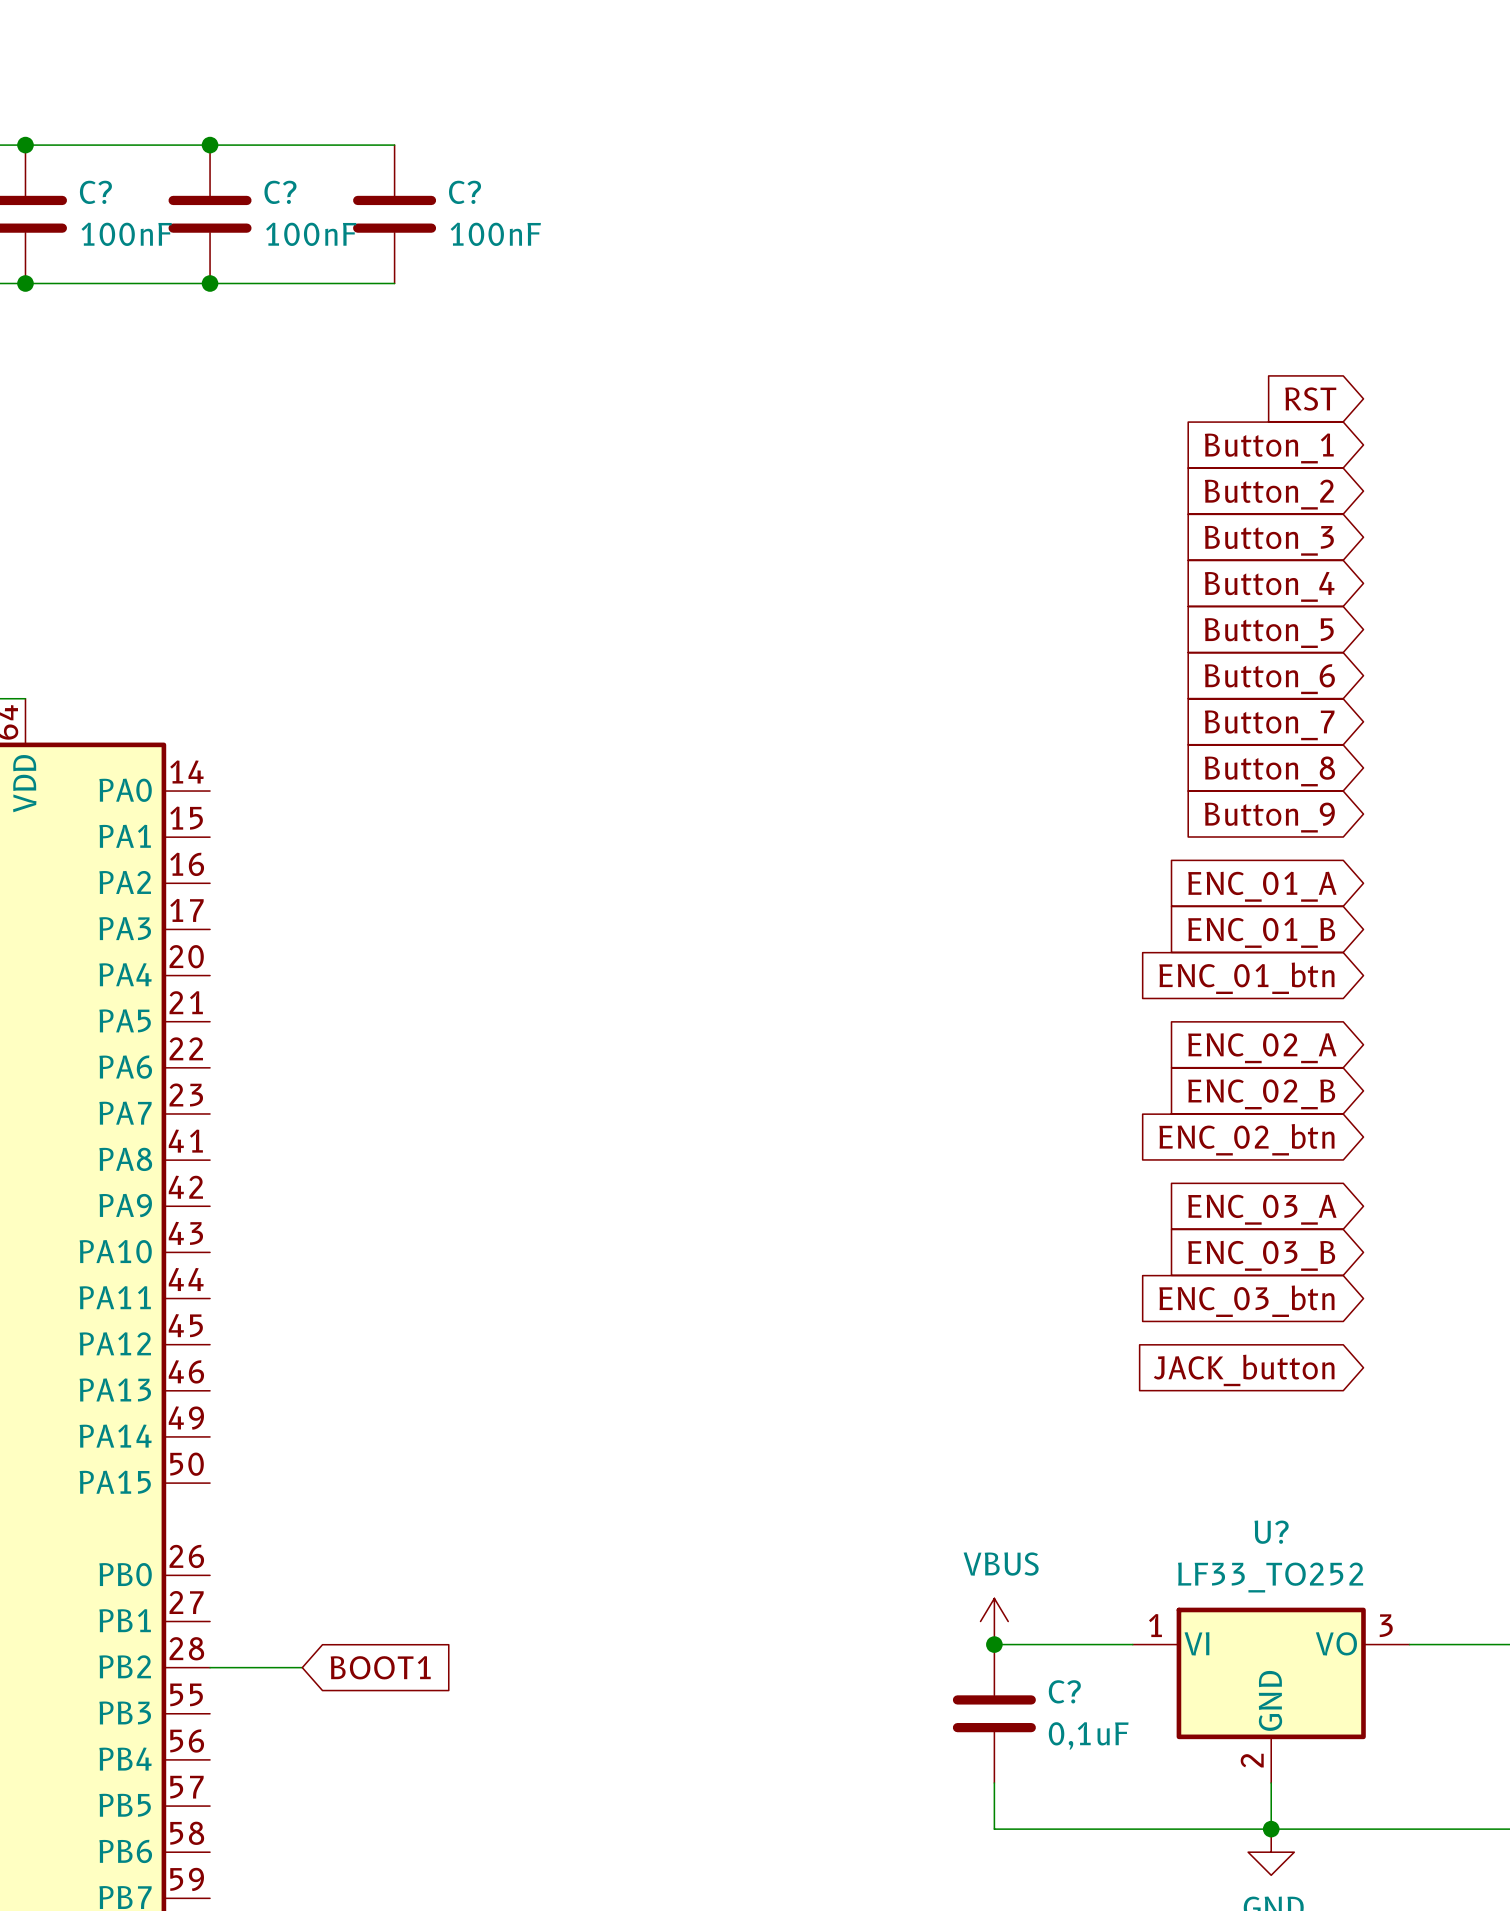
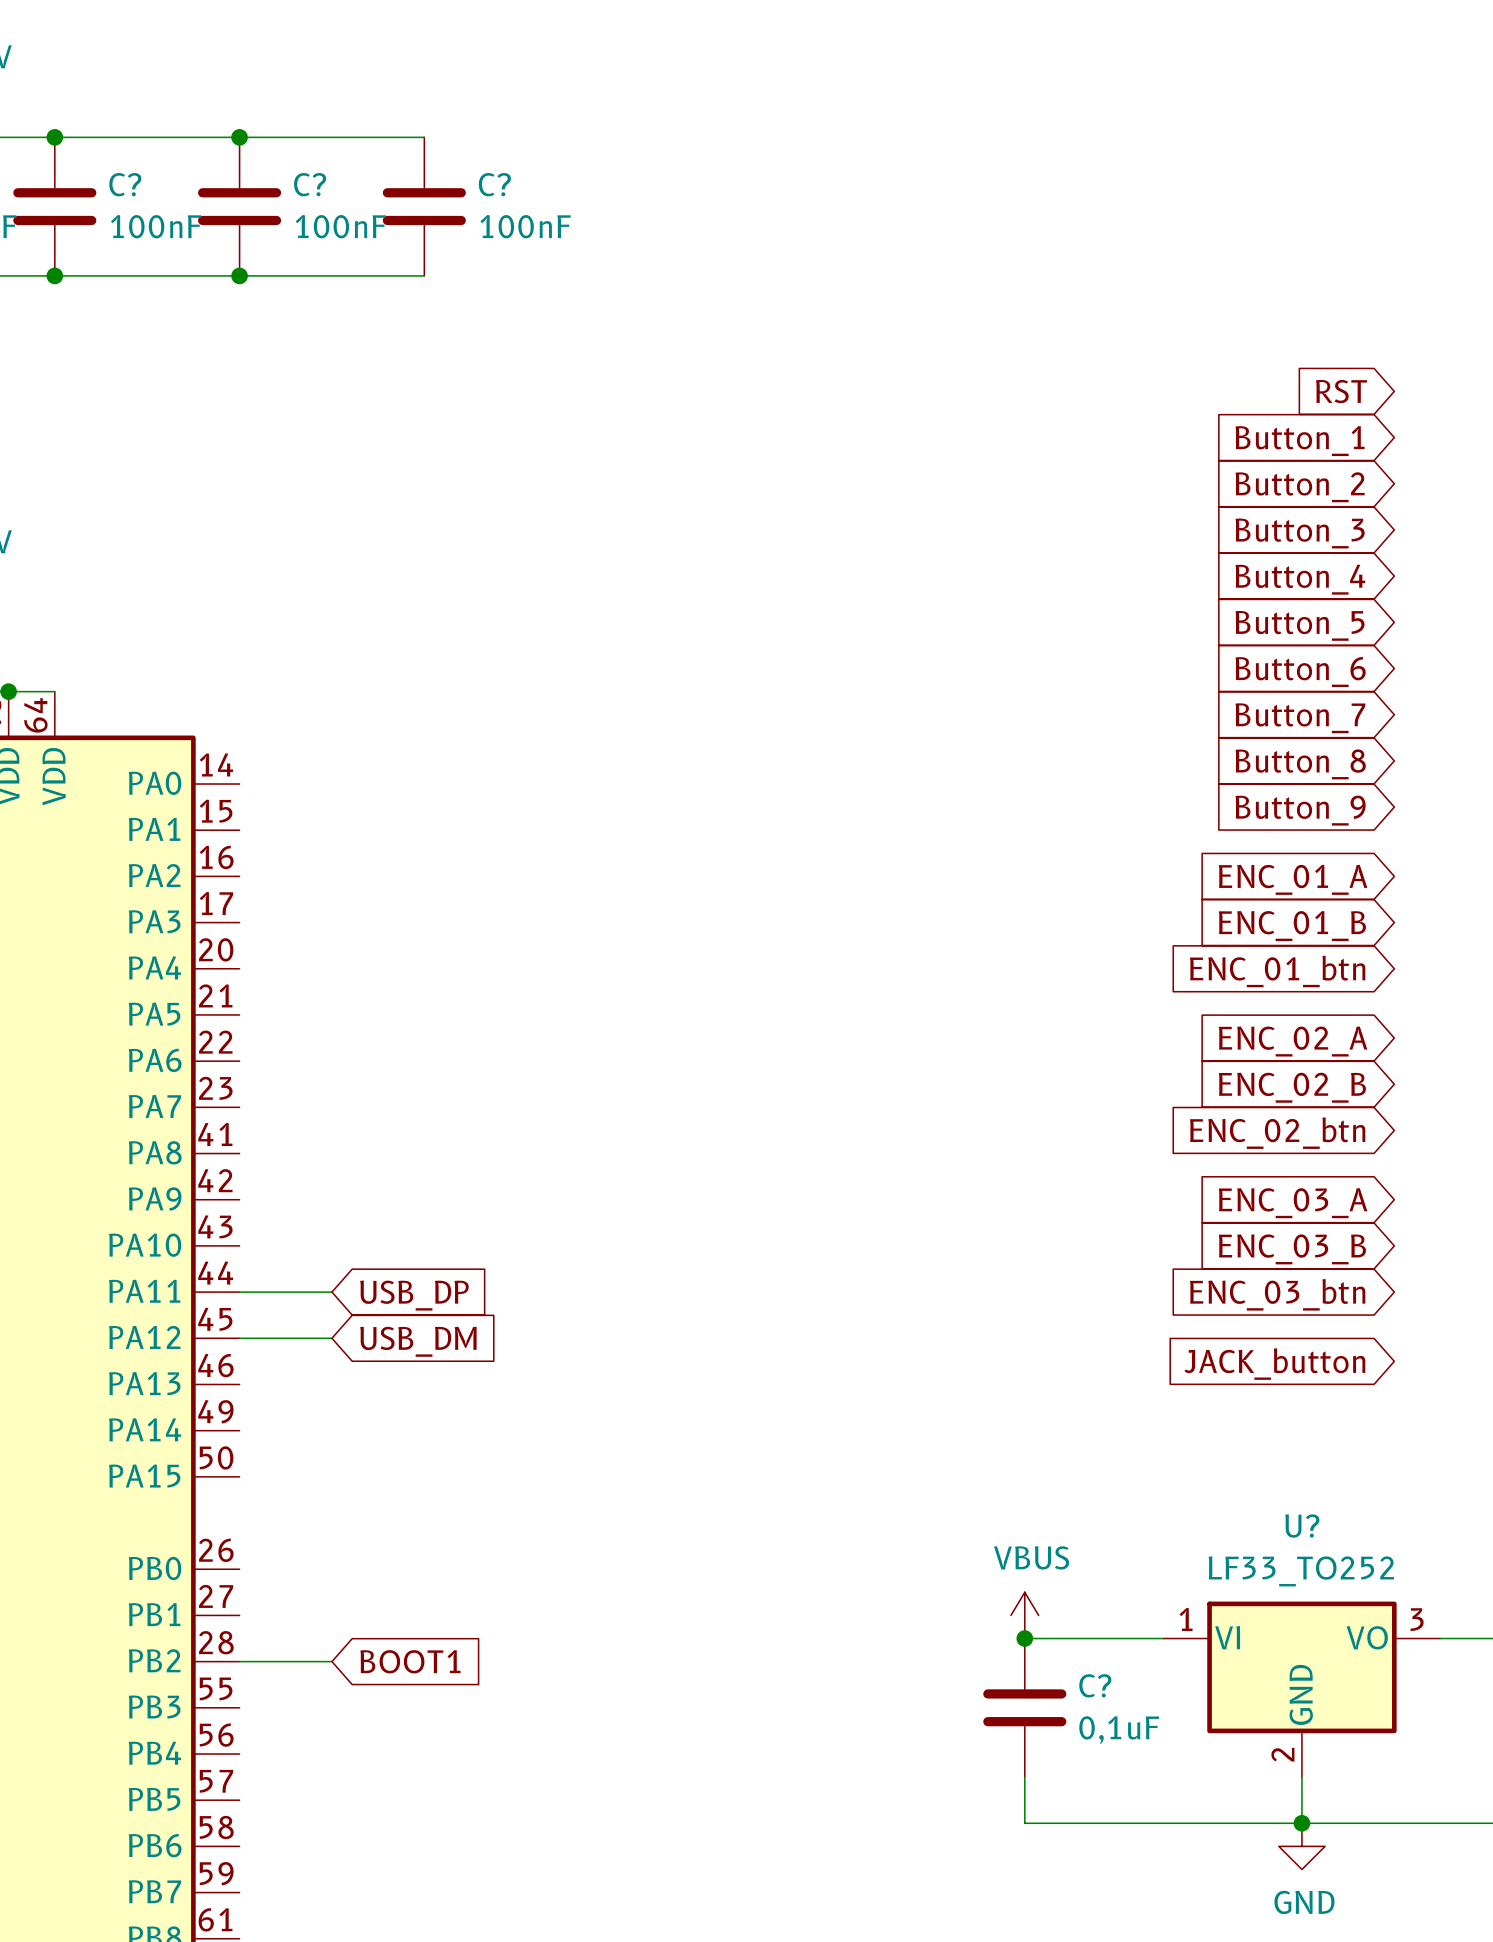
wire: none -> (239, 1292) (331, 1292)
global label: none -> USB_DP (414, 1295)
wire: none -> (239, 1338) (331, 1338)
global label: none -> USB_DM (418, 1341)

